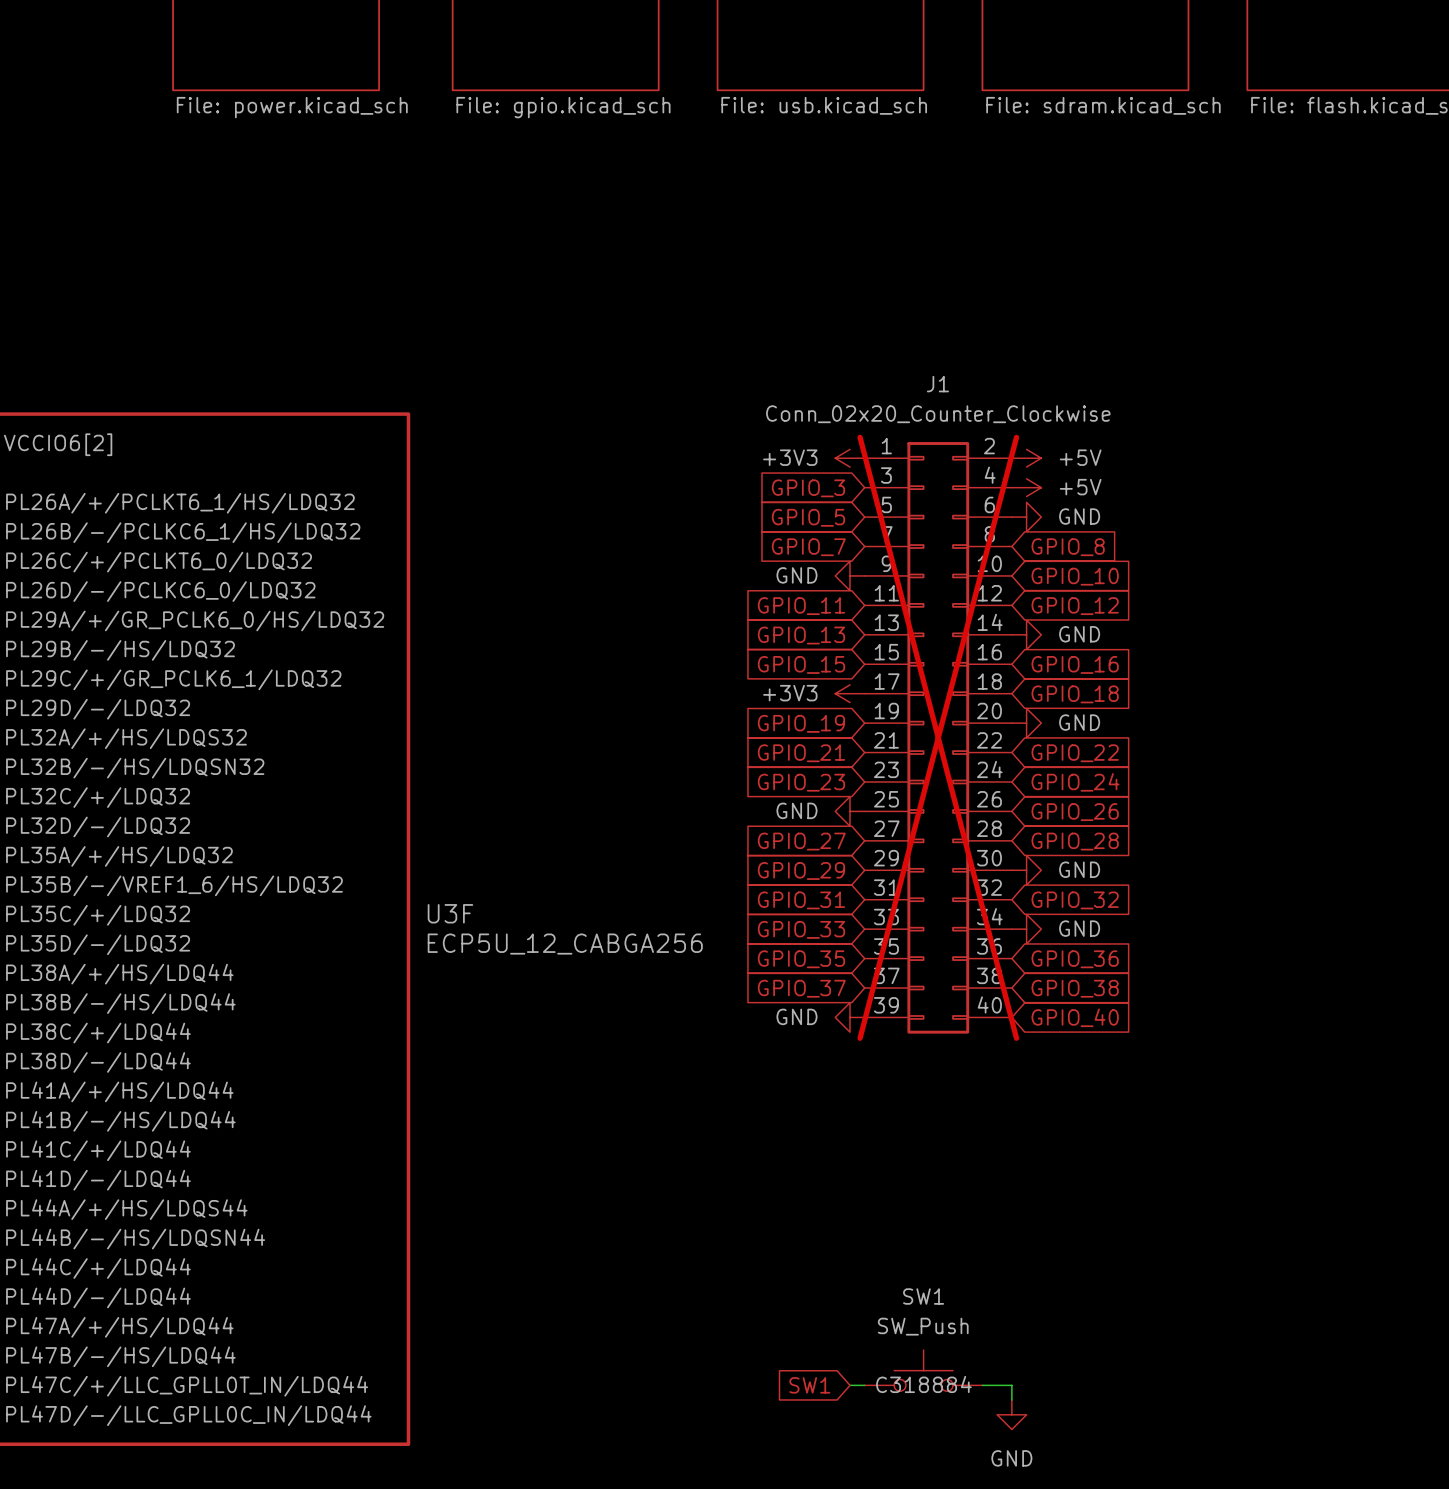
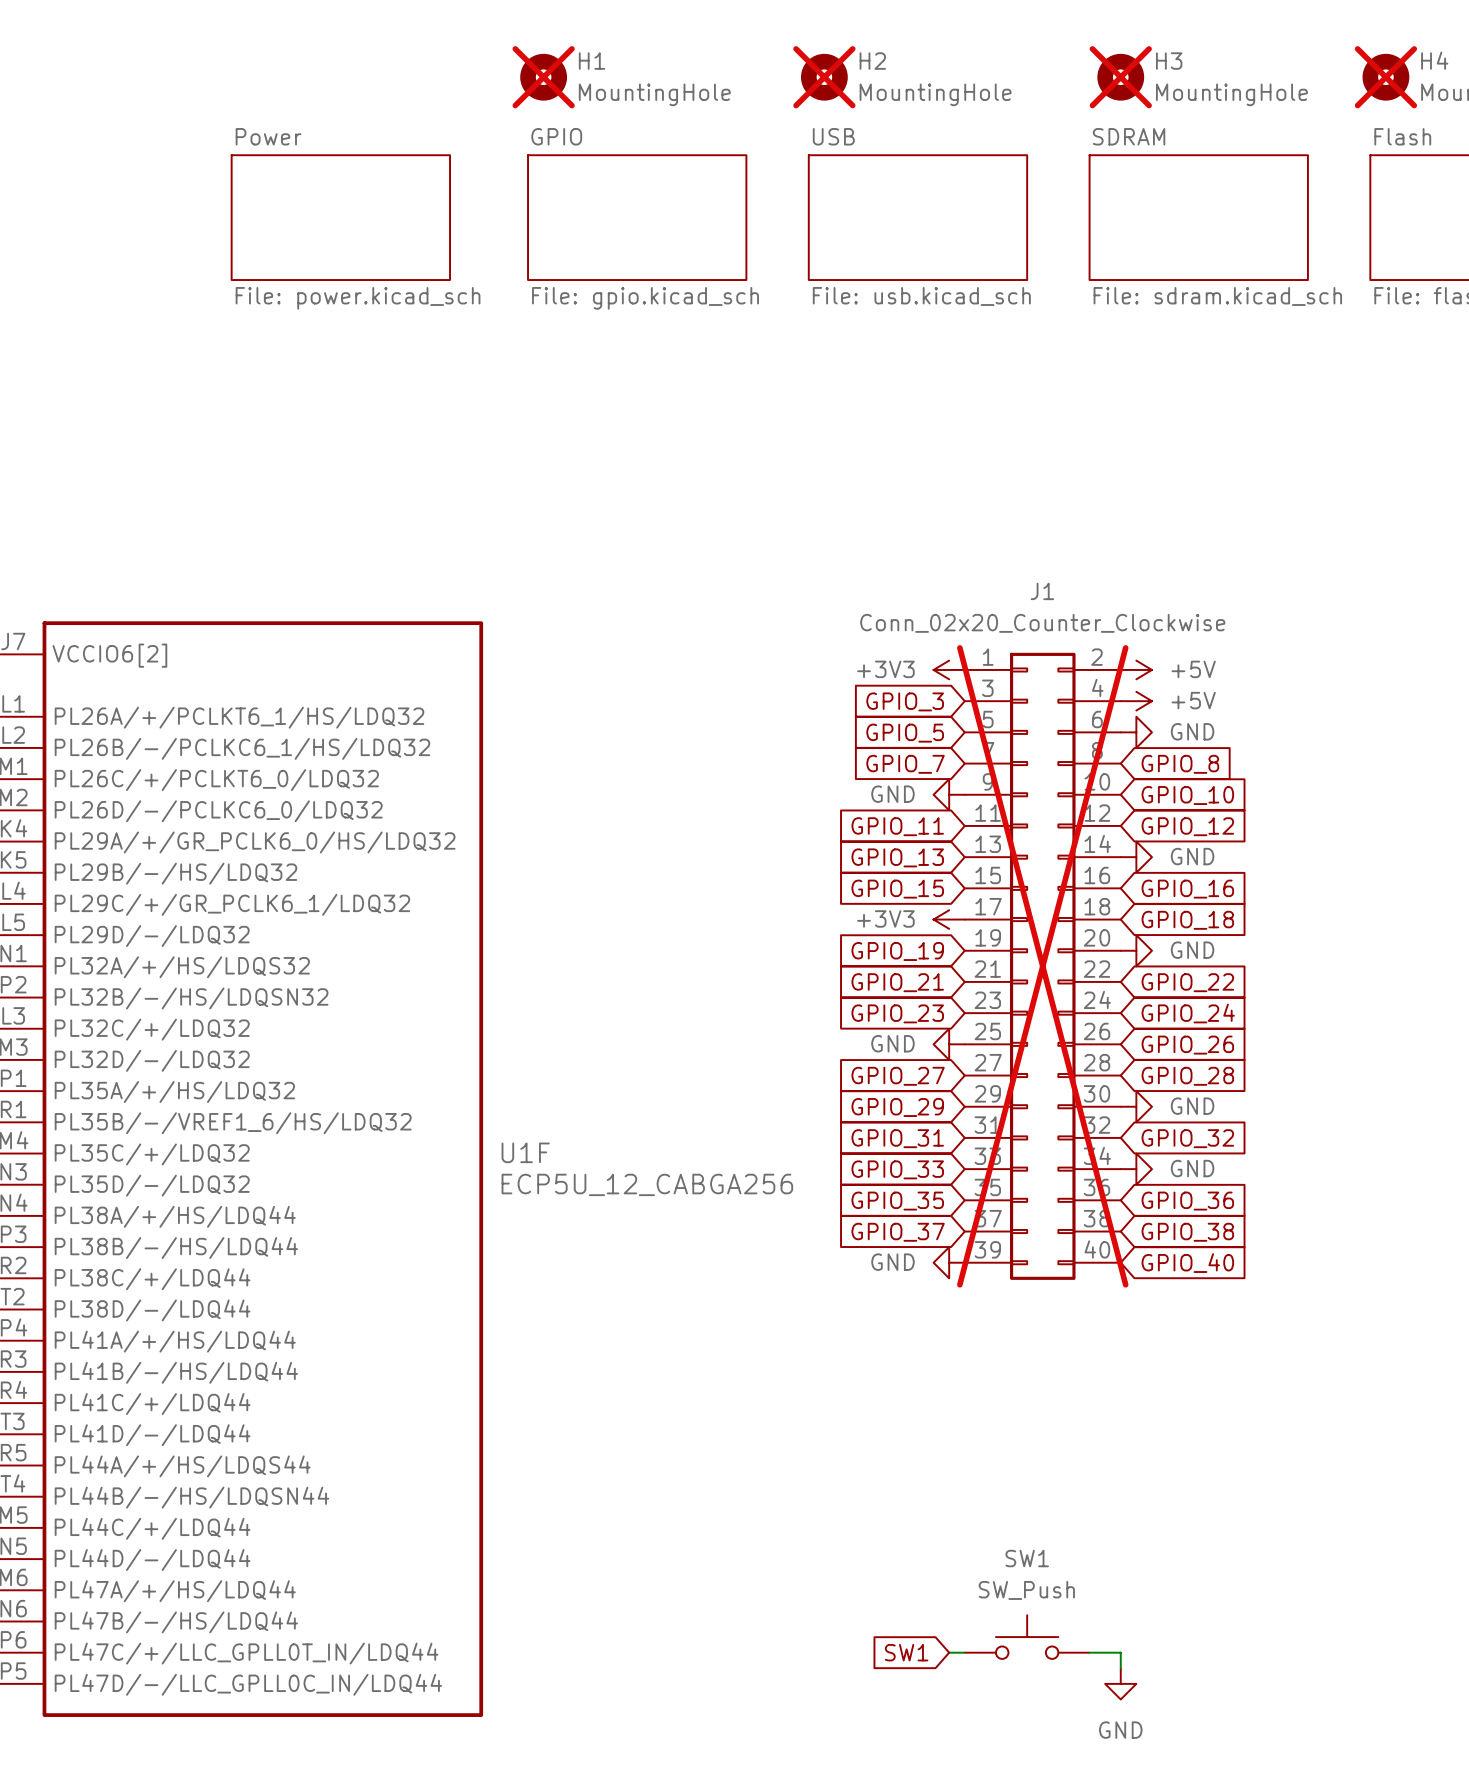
U3F name: U3F (450, 913) -> U1F (525, 1152)
SW1 text: C318884 (923, 1384) -> none

